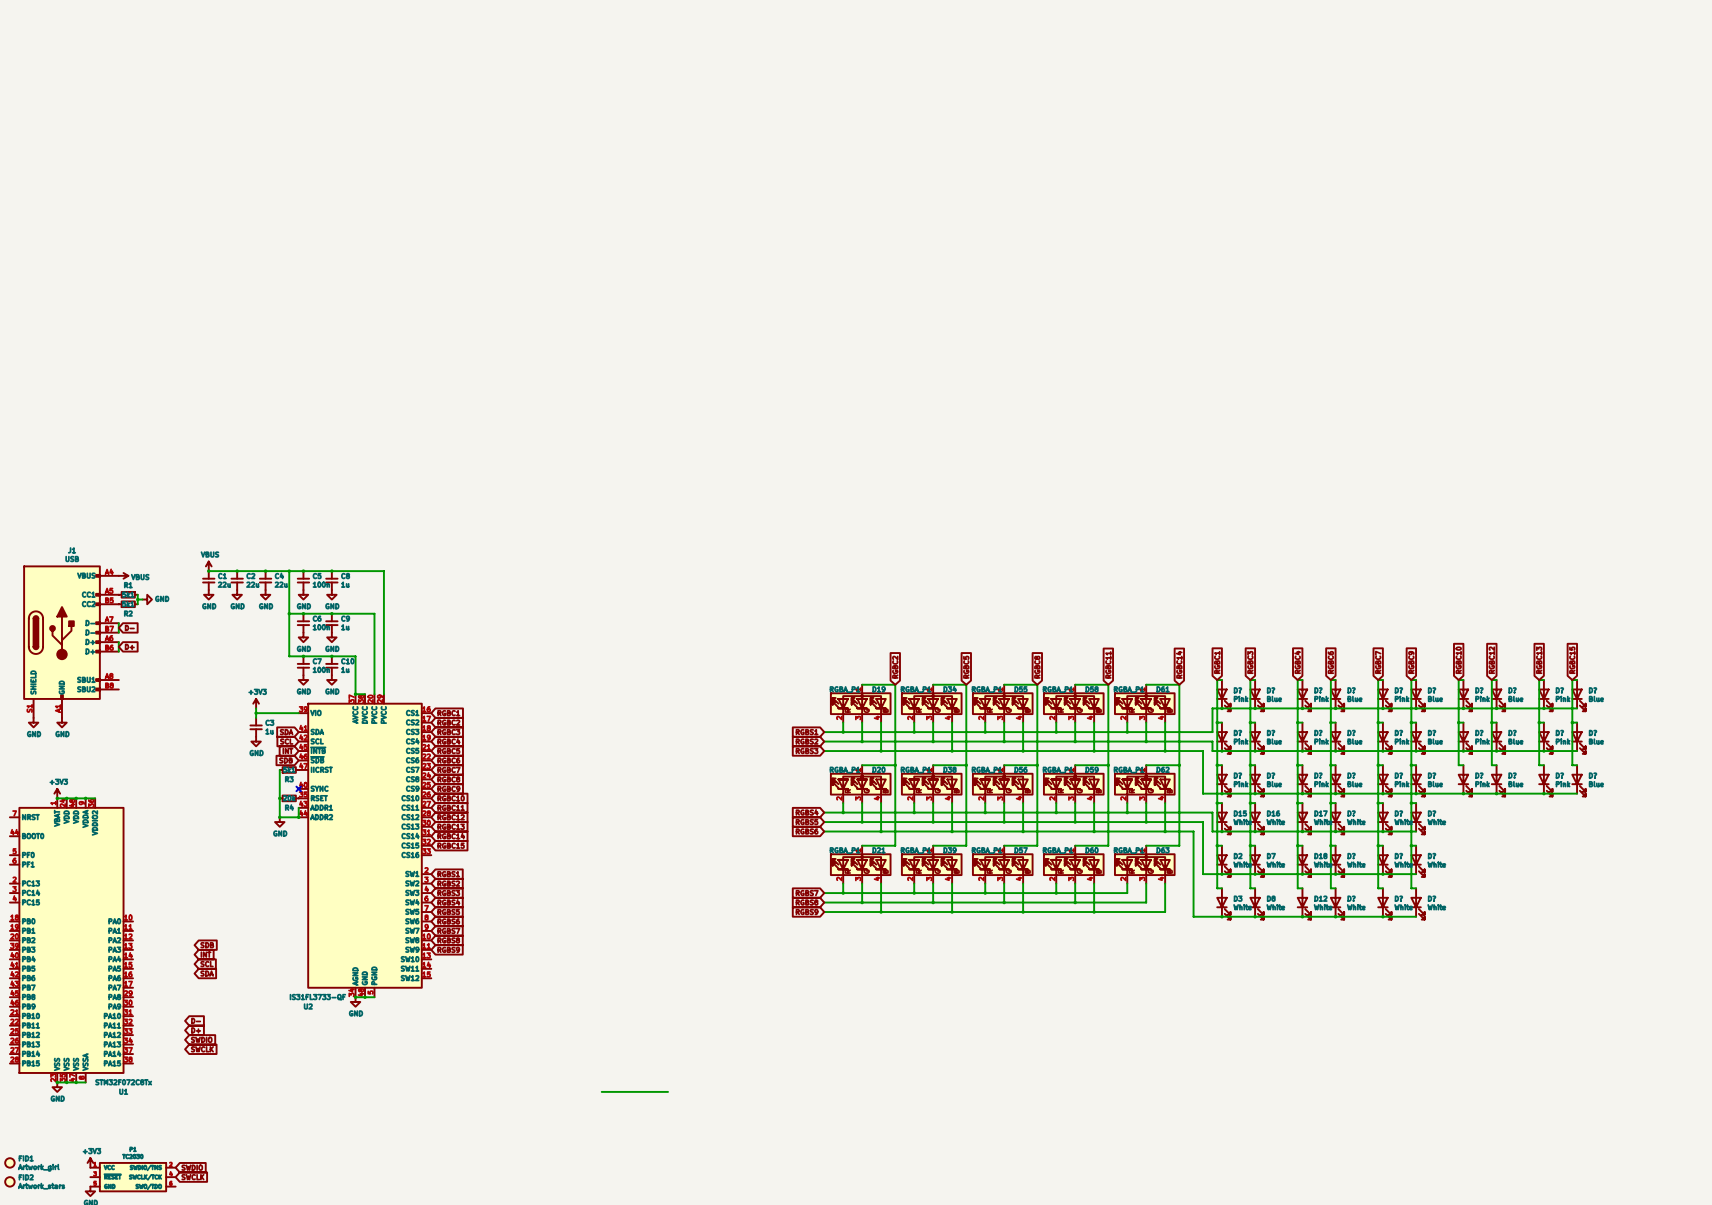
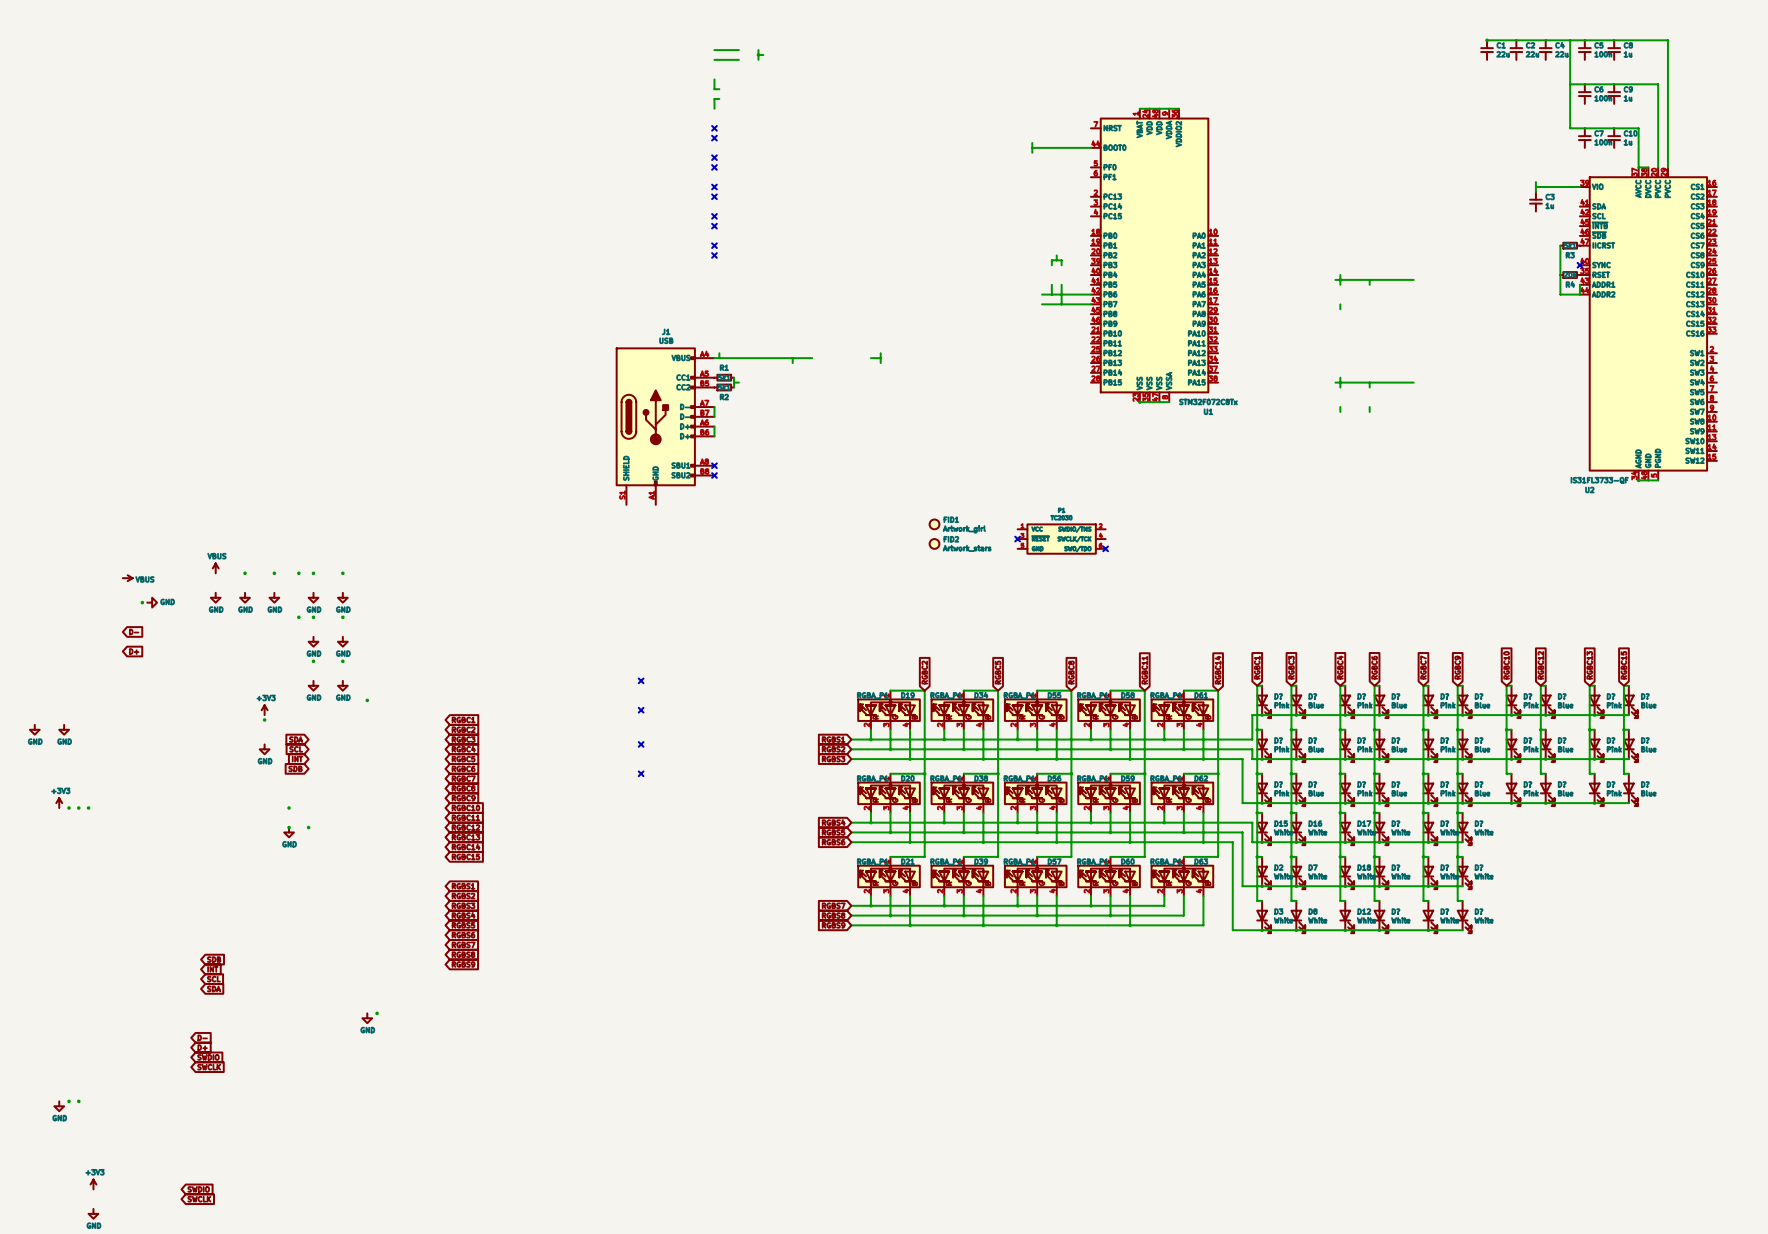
wire: none -> (1487, 40) (1667, 40) (1667, 167)
junction: none -> (1487, 40)
wire: none -> (1570, 40) (1570, 128) (1638, 128) (1638, 167) (1648, 167)
wire: none -> (714, 50) (738, 50)
wire: none -> (758, 50) (758, 59)
wire: none -> (758, 54) (763, 54)
wire: none -> (714, 59) (738, 59)
wire: none -> (714, 79) (714, 89) (719, 89)
wire: none -> (1570, 84) (1658, 84) (1658, 167)
wire: none -> (719, 98) (714, 98) (714, 108)
wire: none -> (1139, 108) (1178, 108)
no-connect mark: none -> (714, 128)
no-connect mark: none -> (714, 138)
wire: none -> (1032, 142) (1032, 152)
wire: none -> (1032, 147) (1090, 147)
no-connect mark: none -> (714, 157)
no-connect mark: none -> (714, 167)
wire: none -> (1535, 182) (1535, 191)
no-connect mark: none -> (714, 187)
wire: none -> (1535, 187) (1579, 187)
no-connect mark: none -> (714, 196)
no-connect mark: none -> (714, 216)
no-connect mark: none -> (714, 226)
no-connect mark: none -> (714, 245)
wire: none -> (1560, 245) (1560, 294) (1579, 294) (1579, 284)
no-connect mark: none -> (714, 255)
wire: none -> (1056, 255) (1056, 260)
wire: none -> (1051, 265) (1051, 260) (1061, 260) (1061, 265)
no-connect mark: none -> (1579, 265)
wire: none -> (1340, 275) (1340, 284)
wire: none -> (1335, 279) (1413, 279)
wire: none -> (1369, 279) (1369, 284)
wire: none -> (1051, 284) (1051, 294)
wire: none -> (1061, 284) (1061, 304)
wire: none -> (1042, 294) (1090, 294)
wire: none -> (1042, 304) (1090, 304)
wire: none -> (1340, 304) (1340, 309)
wire: none -> (719, 353) (719, 358)
wire: none -> (880, 353) (880, 363)
wire: none -> (714, 358) (812, 358)
wire: none -> (792, 358) (792, 363)
wire: none -> (870, 358) (880, 358)
wire: none -> (734, 377) (734, 387)
wire: none -> (1340, 377) (1340, 387)
wire: none -> (734, 382) (738, 382)
wire: none -> (1335, 382) (1413, 382)
wire: none -> (1369, 382) (1369, 387)
wire: none -> (1139, 402) (1169, 402)
junction: none -> (1139, 402)
wire: none -> (714, 407) (714, 416)
wire: none -> (1340, 407) (1340, 411)
wire: none -> (1369, 407) (1369, 411)
wire: none -> (714, 426) (714, 436)
no-connect mark: none -> (714, 465)
no-connect mark: none -> (714, 475)
wire: none -> (1638, 480) (1658, 480)
junction: none -> (1638, 480)
no-connect mark: none -> (1017, 539)
no-connect mark: none -> (1105, 548)
wire: (208, 571) (383, 571) (383, 694) -> none
junction: (208, 571) -> none
wire: (289, 571) (289, 656) (355, 656) (355, 694) (365, 694) -> none
part position: (208, 580) -> (1487, 50)
part position: (237, 580) -> (1516, 50)
part position: (265, 580) -> (1545, 50)
part position: (303, 580) -> (1584, 50)
part position: (331, 580) -> (1614, 50)
part position: (128, 594) -> (724, 377)
wire: (137, 594) (137, 604) -> none
wire: (137, 599) (142, 599) -> none
part position: (128, 604) -> (724, 387)
wire: (289, 613) (374, 613) (374, 694) -> none
wire: (118, 623) (118, 632) -> none
part position: (303, 623) -> (1584, 94)
part position: (331, 623) -> (1614, 94)
part position: (71, 641) -> (665, 426)
wire: (118, 642) (118, 651) -> none
part position: (303, 665) -> (1584, 138)
part position: (331, 665) -> (1614, 138)
no-connect mark: none -> (641, 680)
no-connect mark: none -> (641, 710)
wire: (256, 708) (256, 717) -> none
wire: (256, 713) (298, 713) -> none
part position: (256, 727) -> (1535, 201)
no-connect mark: none -> (641, 744)
no-connect mark: none -> (641, 773)
wire: (279, 769) (279, 817) (298, 817) (298, 807) -> none
part position: (289, 769) -> (1570, 245)
no-connect mark: (298, 788) -> none
wire: (57, 798) (95, 798) -> none
junction: (57, 798) -> none
part position: (289, 798) -> (1570, 275)
part position: (365, 845) -> (1648, 323)
part position: (71, 940) -> (1154, 255)
wire: (355, 997) (374, 997) -> none
junction: (355, 997) -> none
wire: (57, 1082) (85, 1082) -> none
junction: (57, 1082) -> none
wire: (601, 1091) (668, 1091) -> none
part position: (9, 1162) -> (934, 524)
part position: (133, 1177) -> (1061, 539)
part position: (9, 1181) -> (934, 543)

